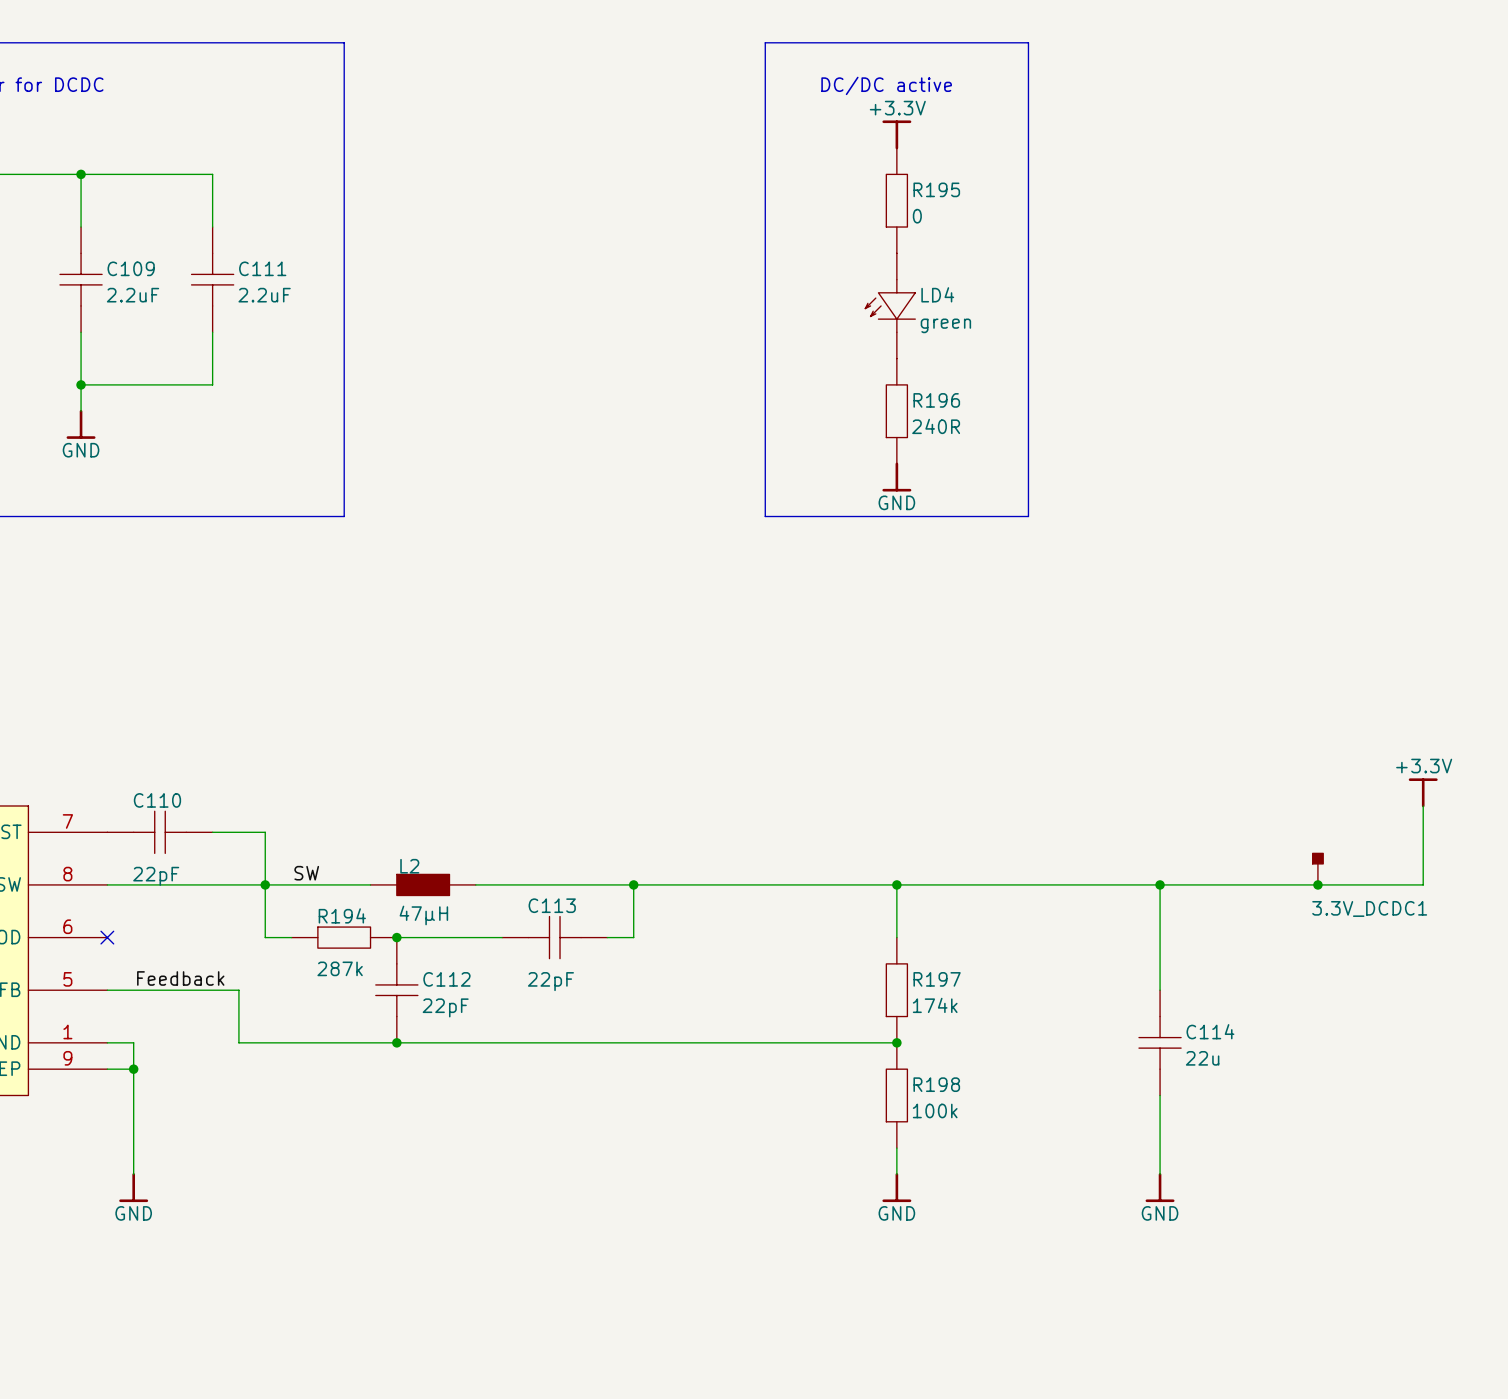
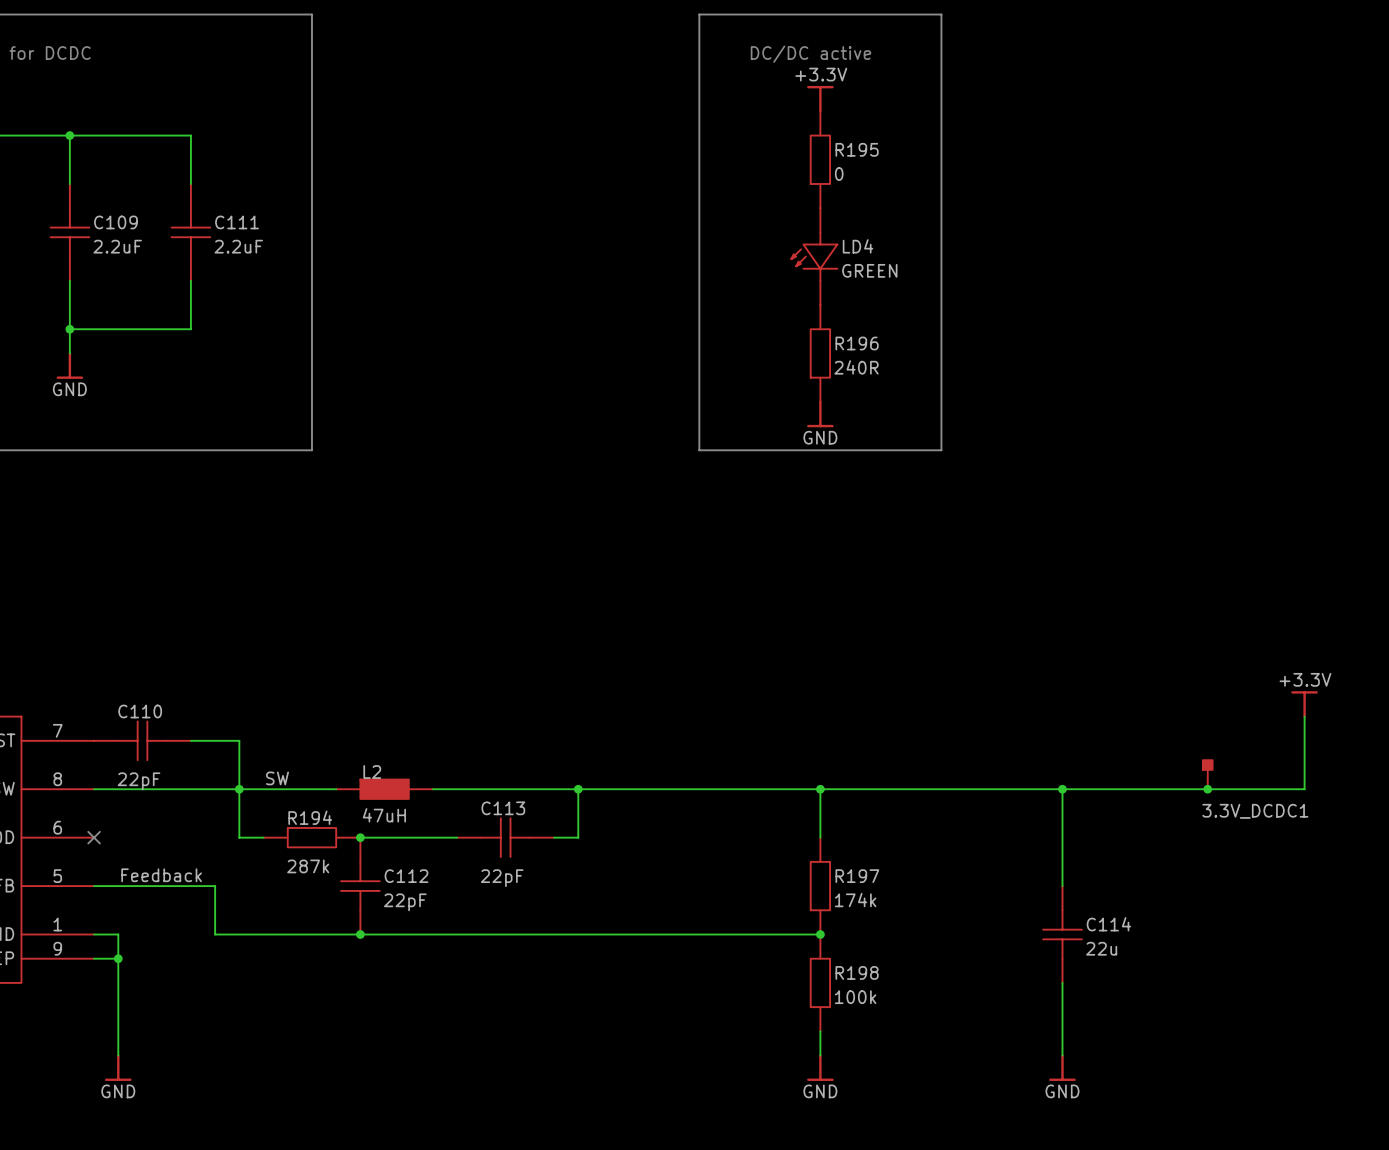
LD4 value: green (945, 325) -> GREEN (869, 270)
L2 value: 47µH (423, 915) -> 47uH (384, 815)

